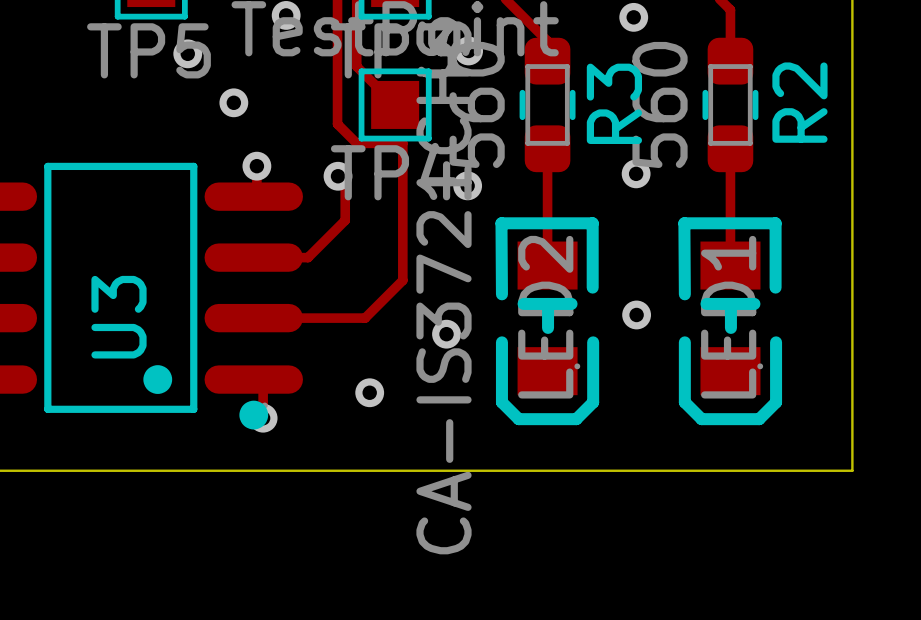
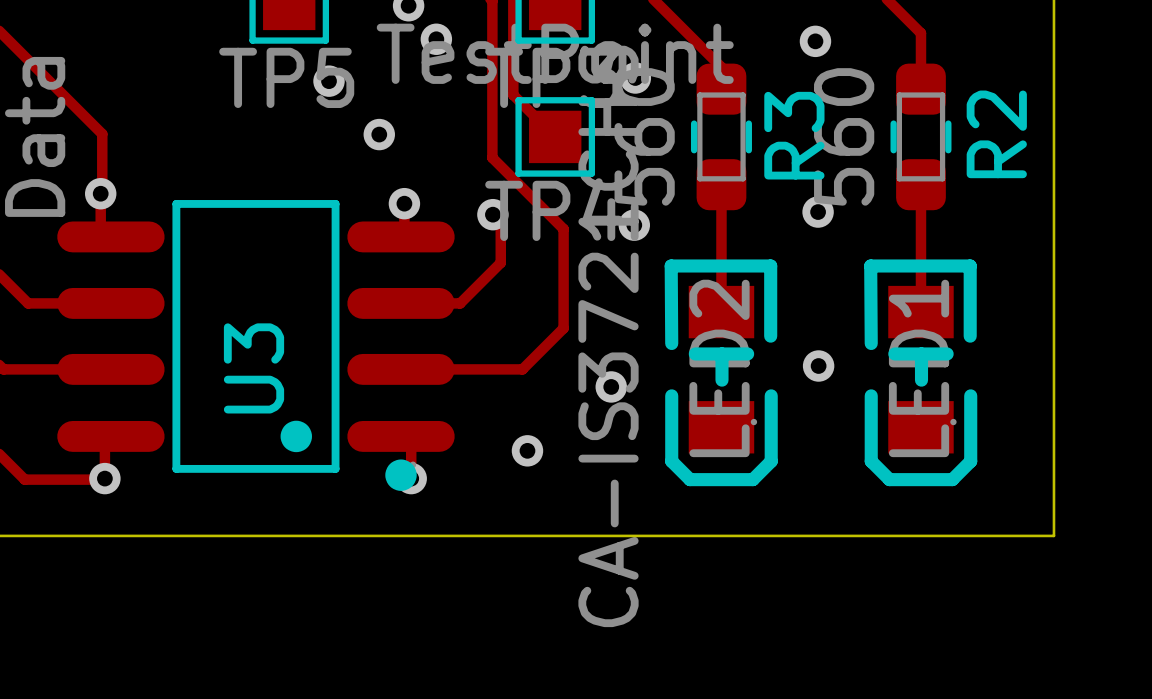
track: (356, 143) (402, 143) (402, 189) -> (513, 178) (563, 229)

